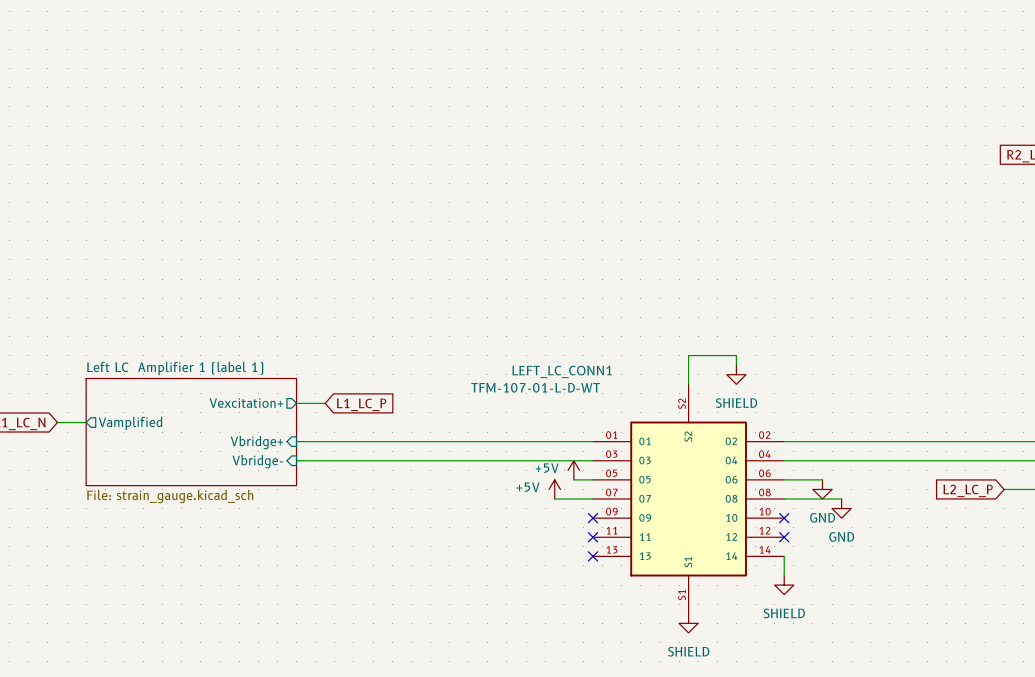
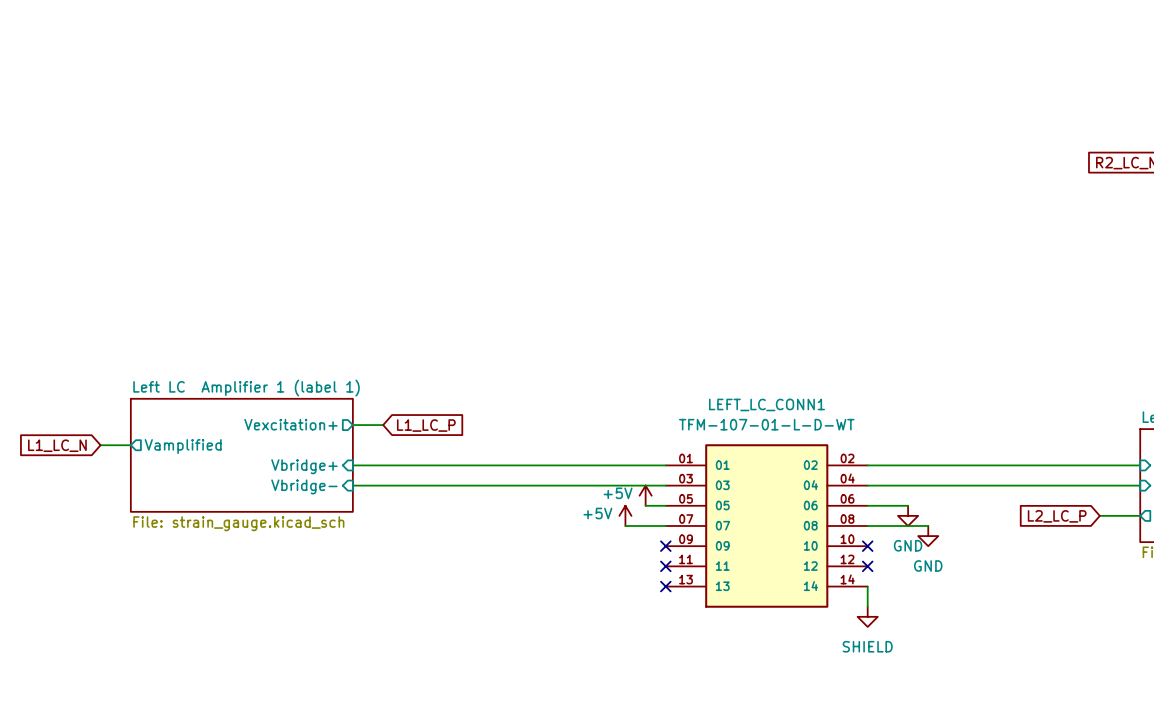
wire: (736, 365) (736, 355) (688, 355) (688, 384) -> none
LEFT_LC_CONN1 name position: LEFT_LC_CONN1 (562, 371) -> LEFT_LC_CONN1 (766, 404)
power symbol: SHIELD (736, 374) -> none
LEFT_LC_CONN1 symbol: [592, 384, 785, 614] -> [665, 444, 868, 608]
LEFT_LC_CONN1 value position: TFM-107-01-L-D-WT (535, 387) -> TFM-107-01-L-D-WT (766, 424)
power symbol: SHIELD (688, 623) -> none

